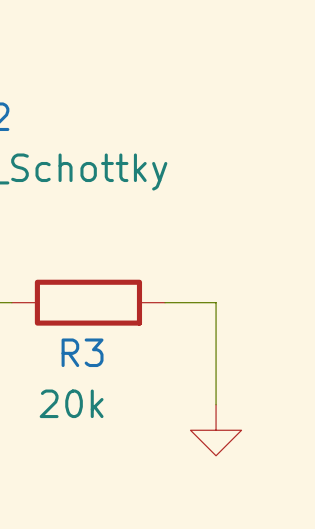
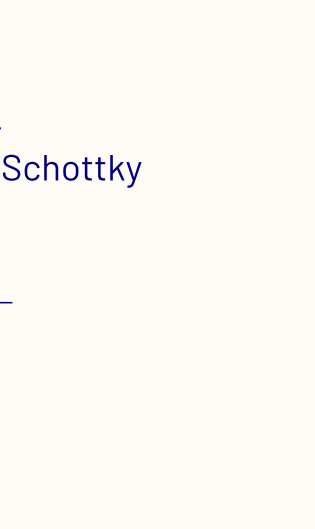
R3: 20k (88, 302) -> none
wire: (165, 302) (216, 302) (216, 404) -> none
power symbol: (216, 430) -> none

